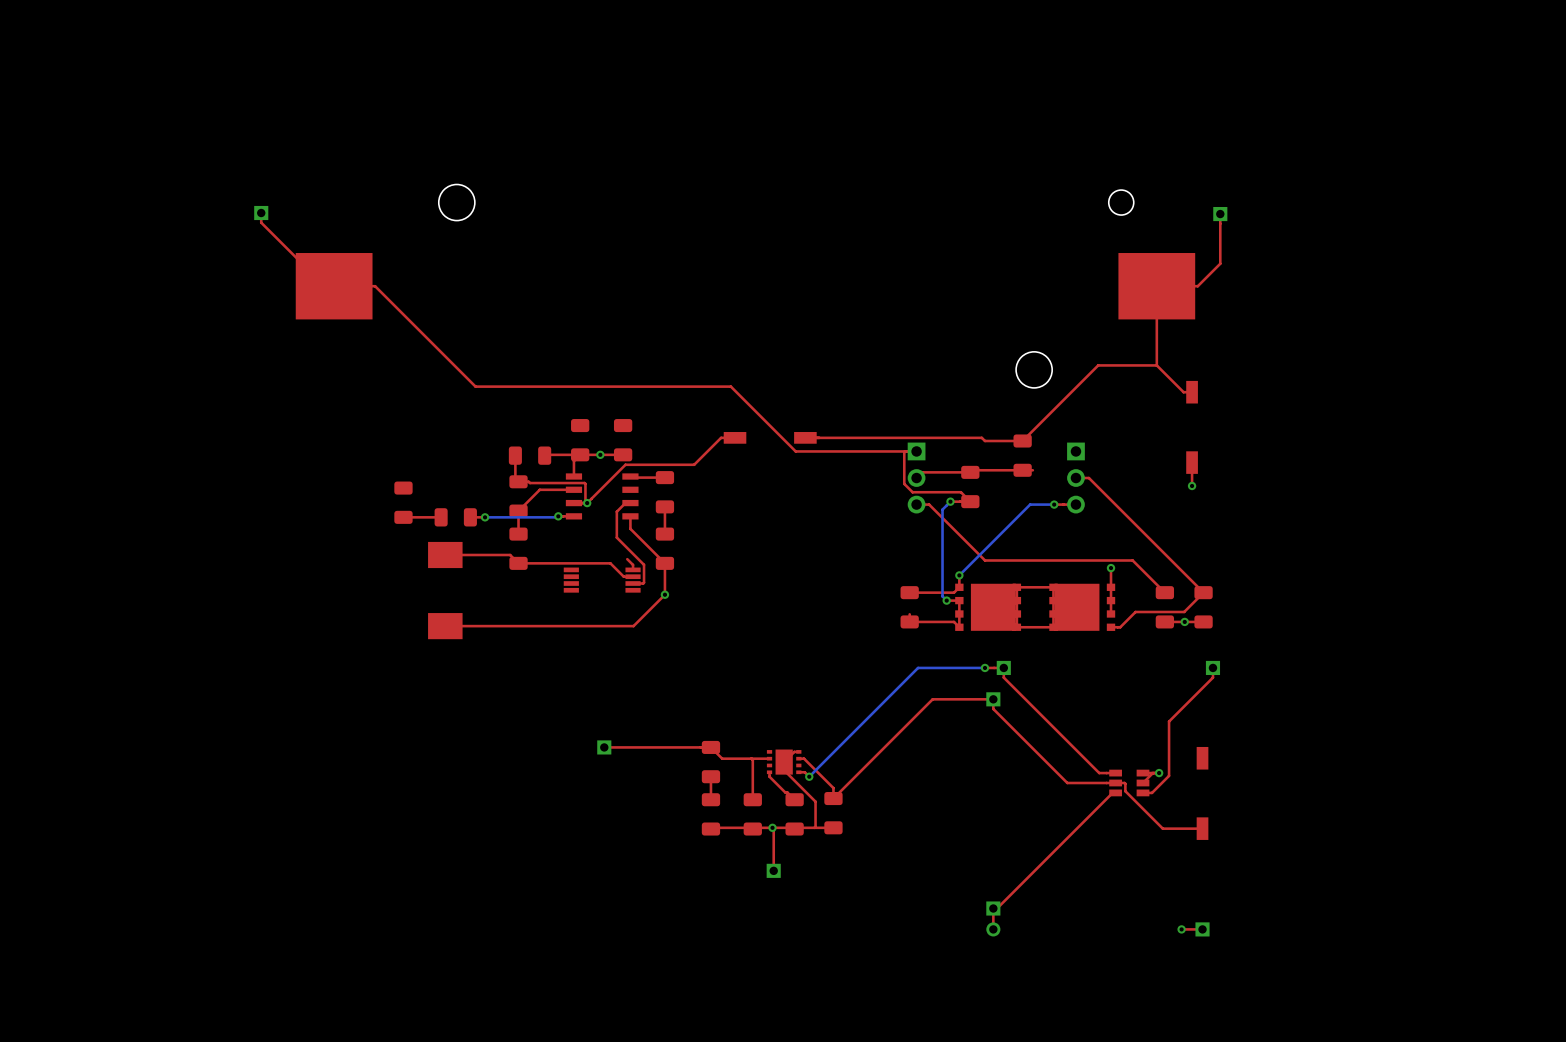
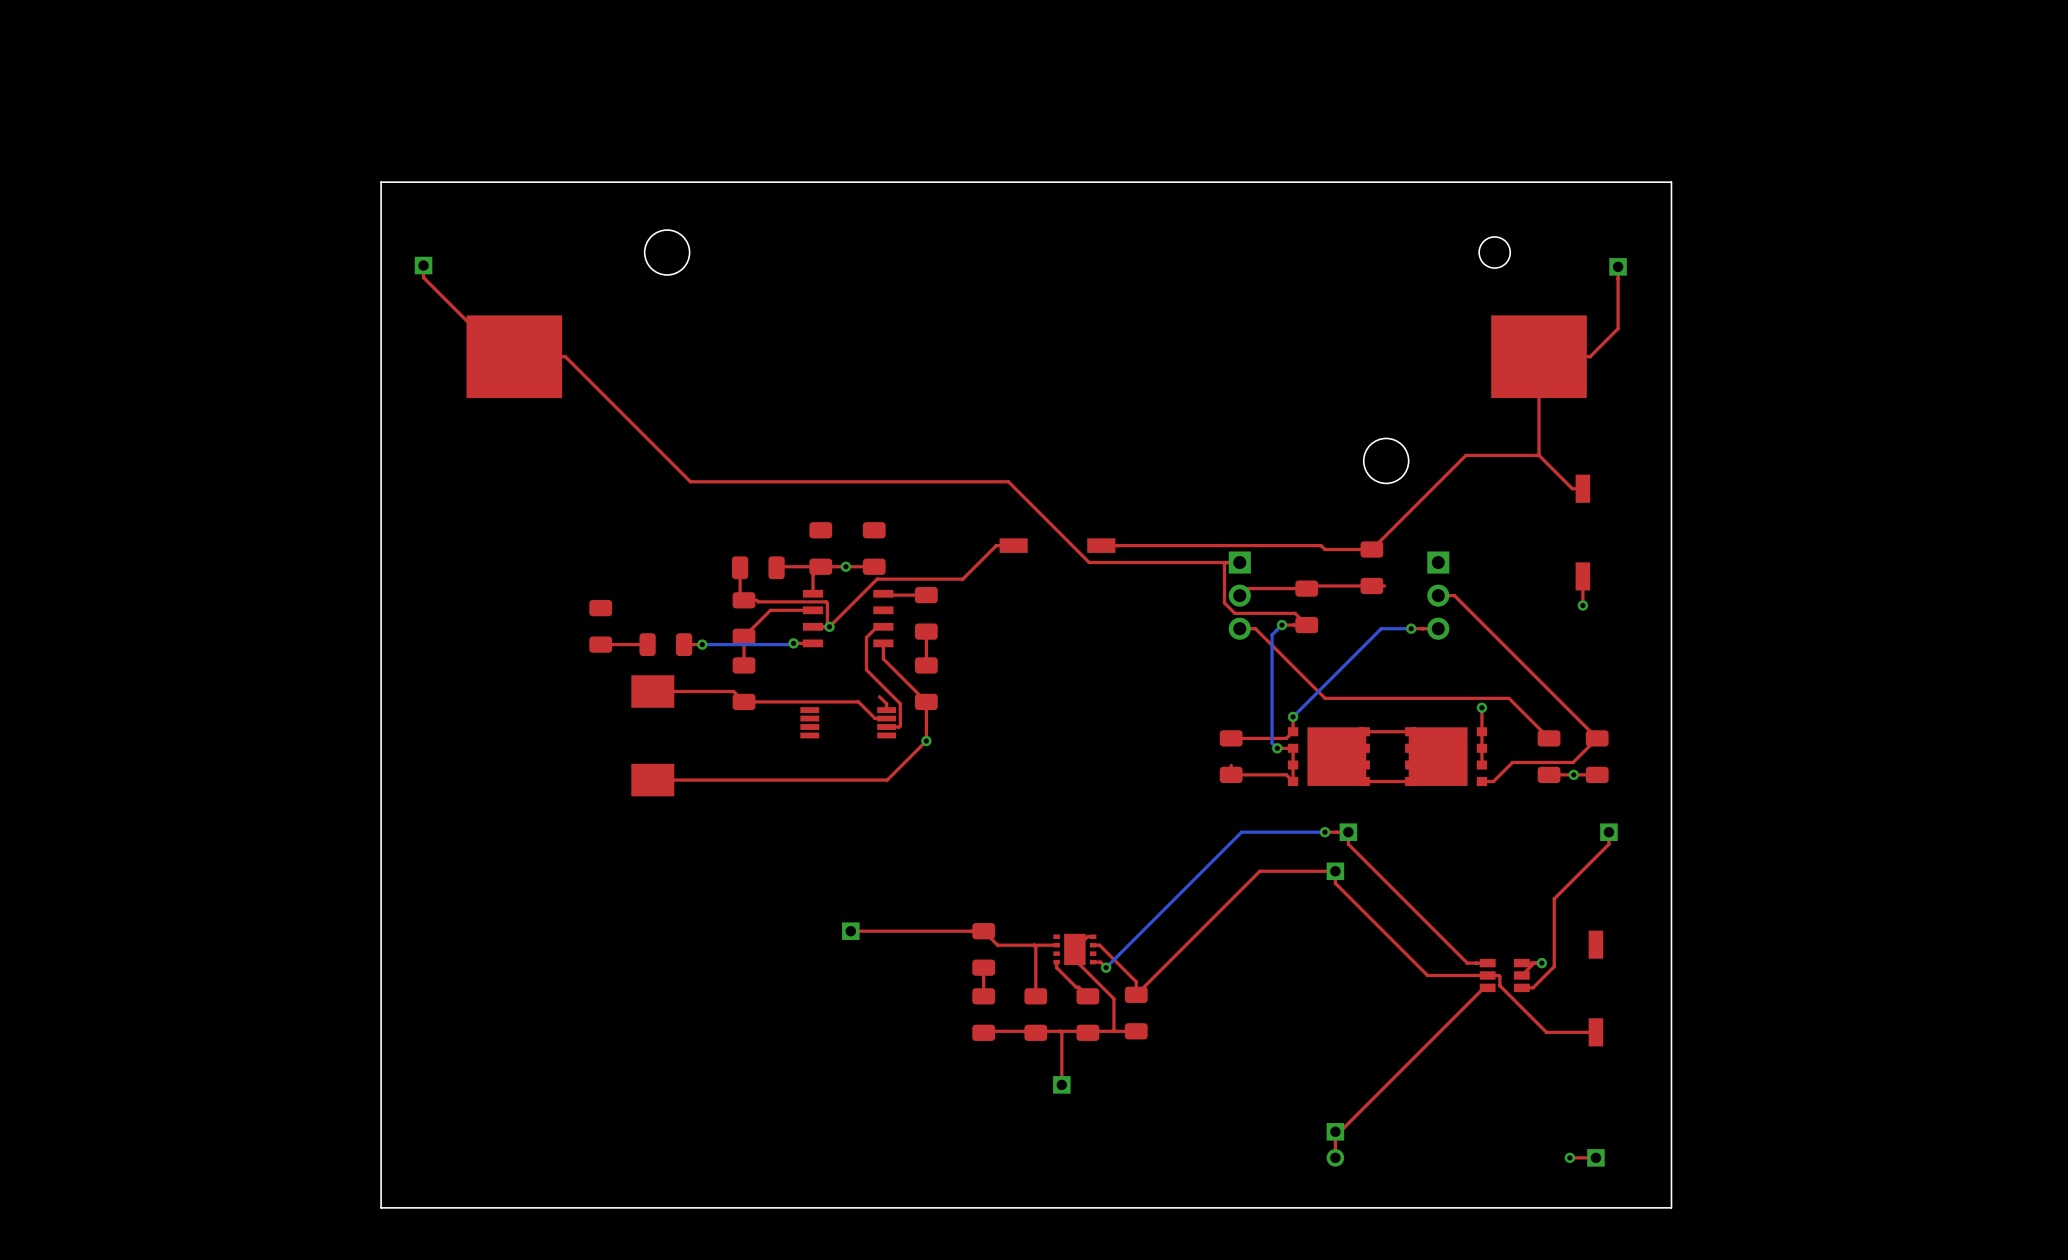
board edge: none -> (1671, 182) (1671, 1207) (381, 1207) (381, 182) (1671, 182)
via: (772, 827) -> none

